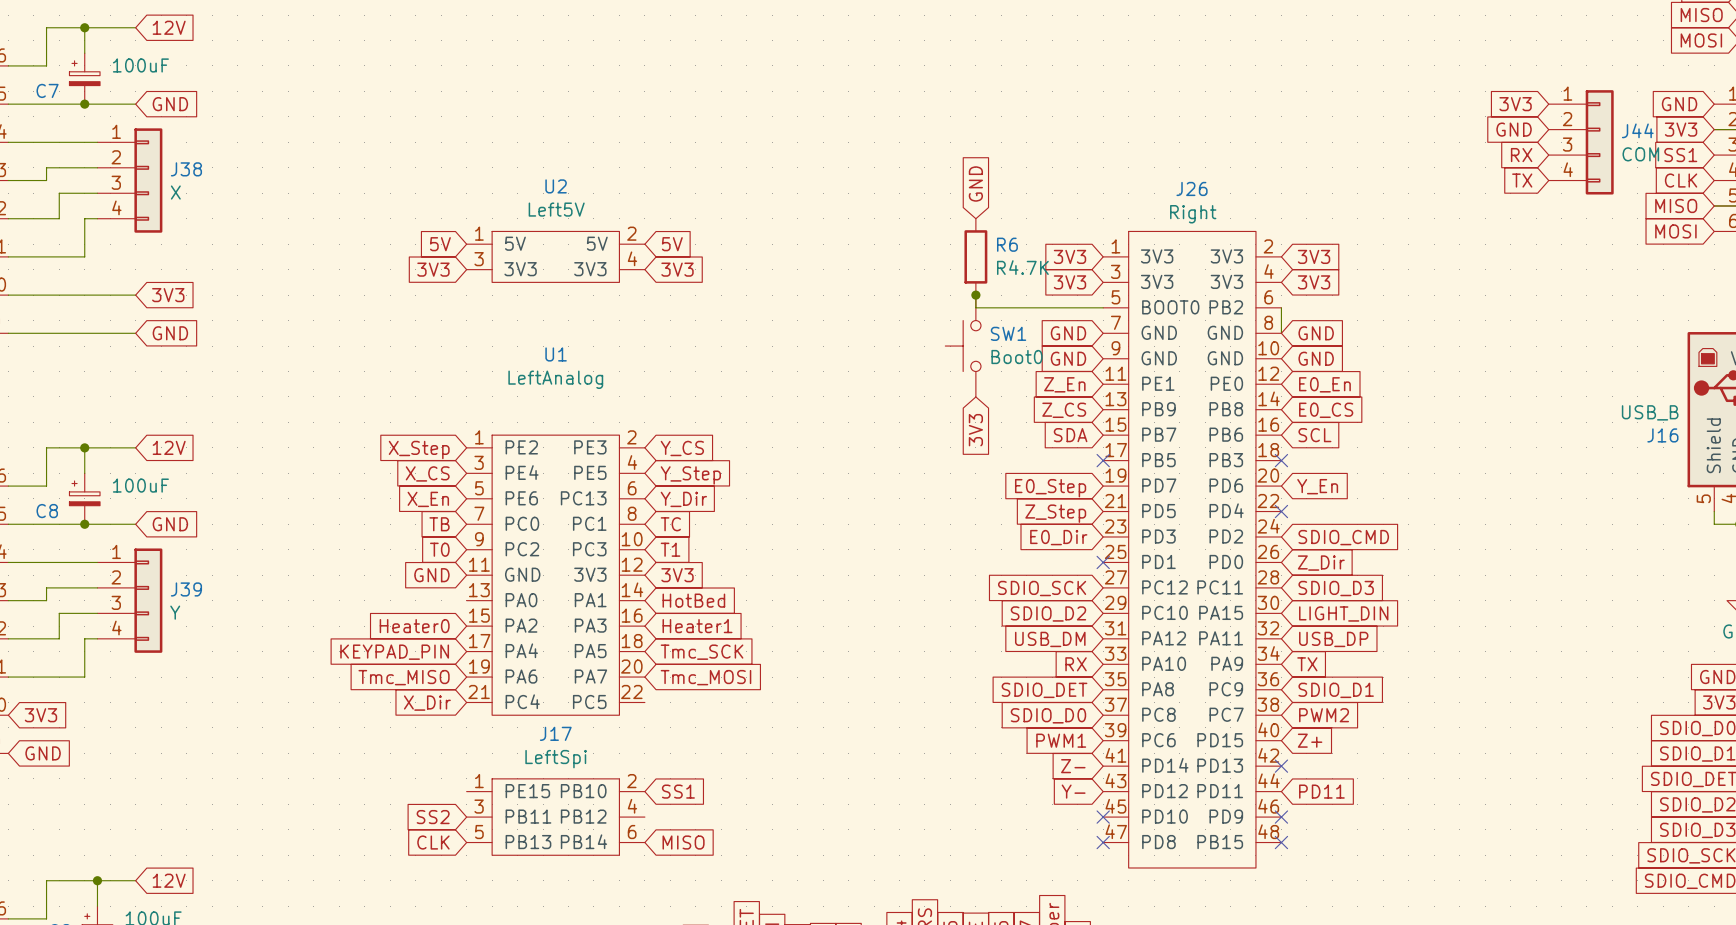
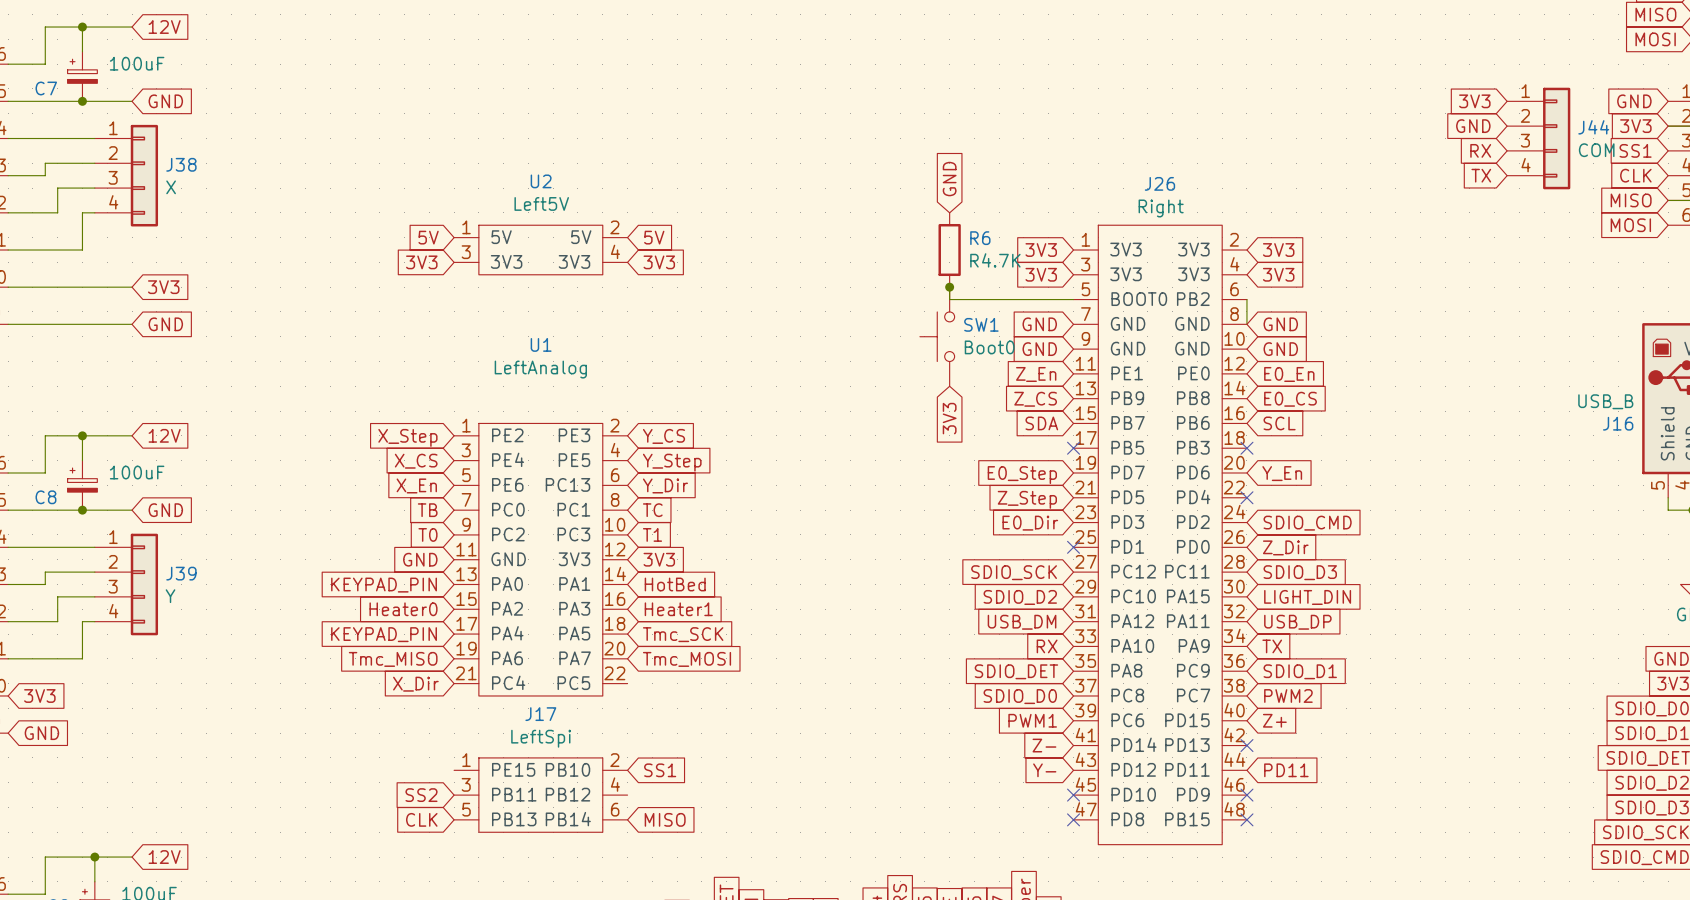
global label: none -> KEYPAD_PIN (384, 585)

